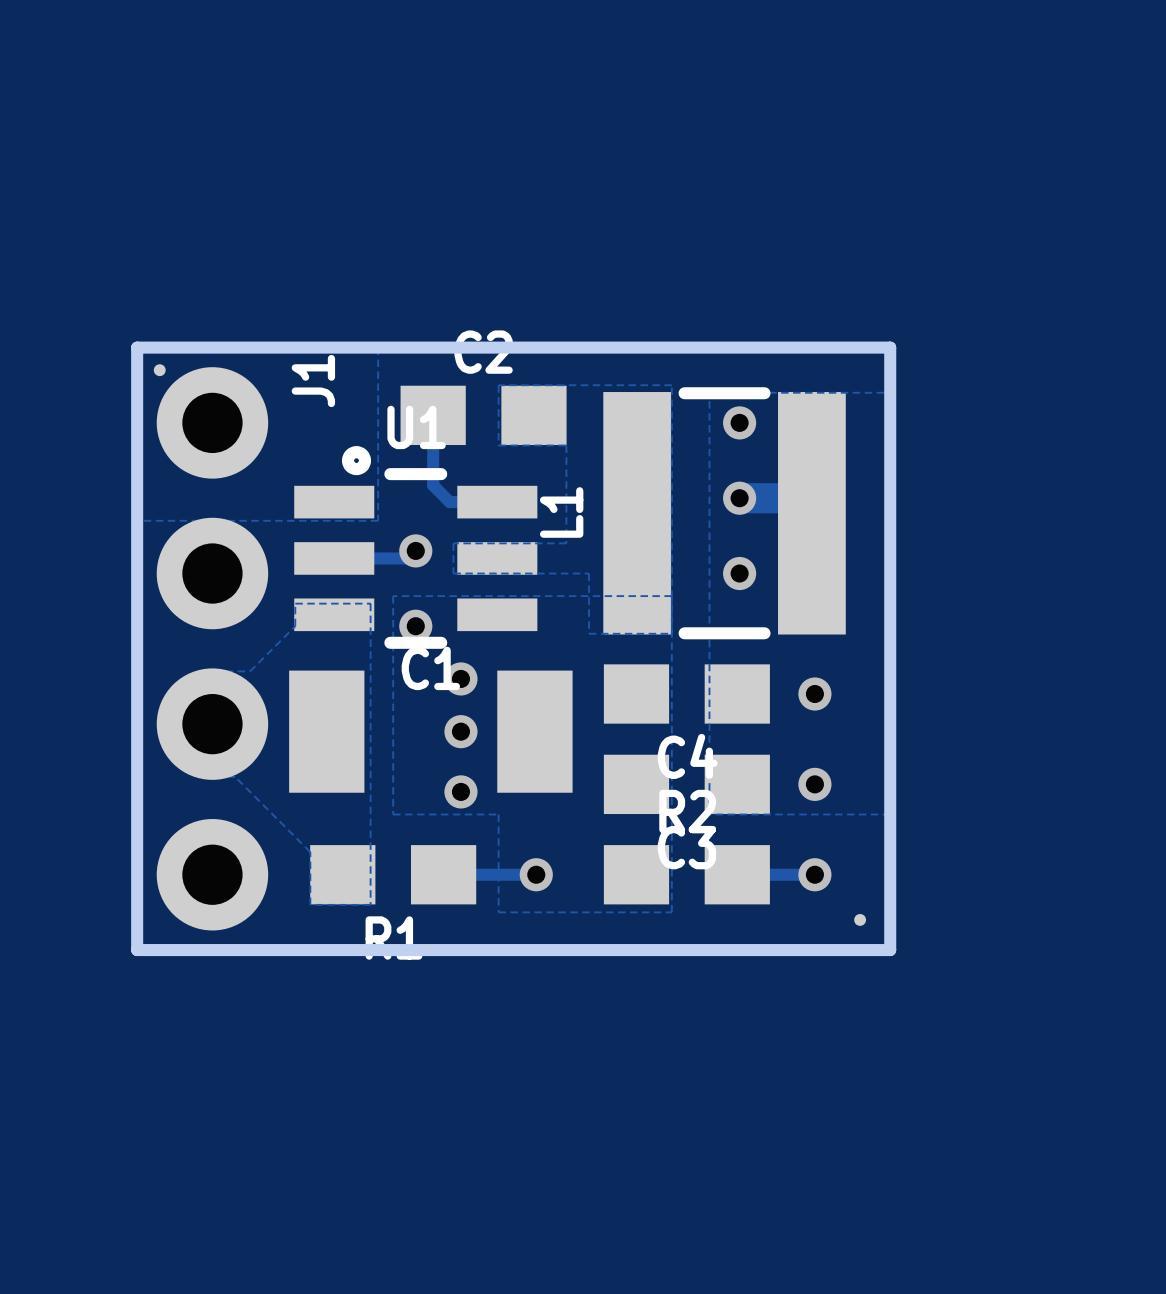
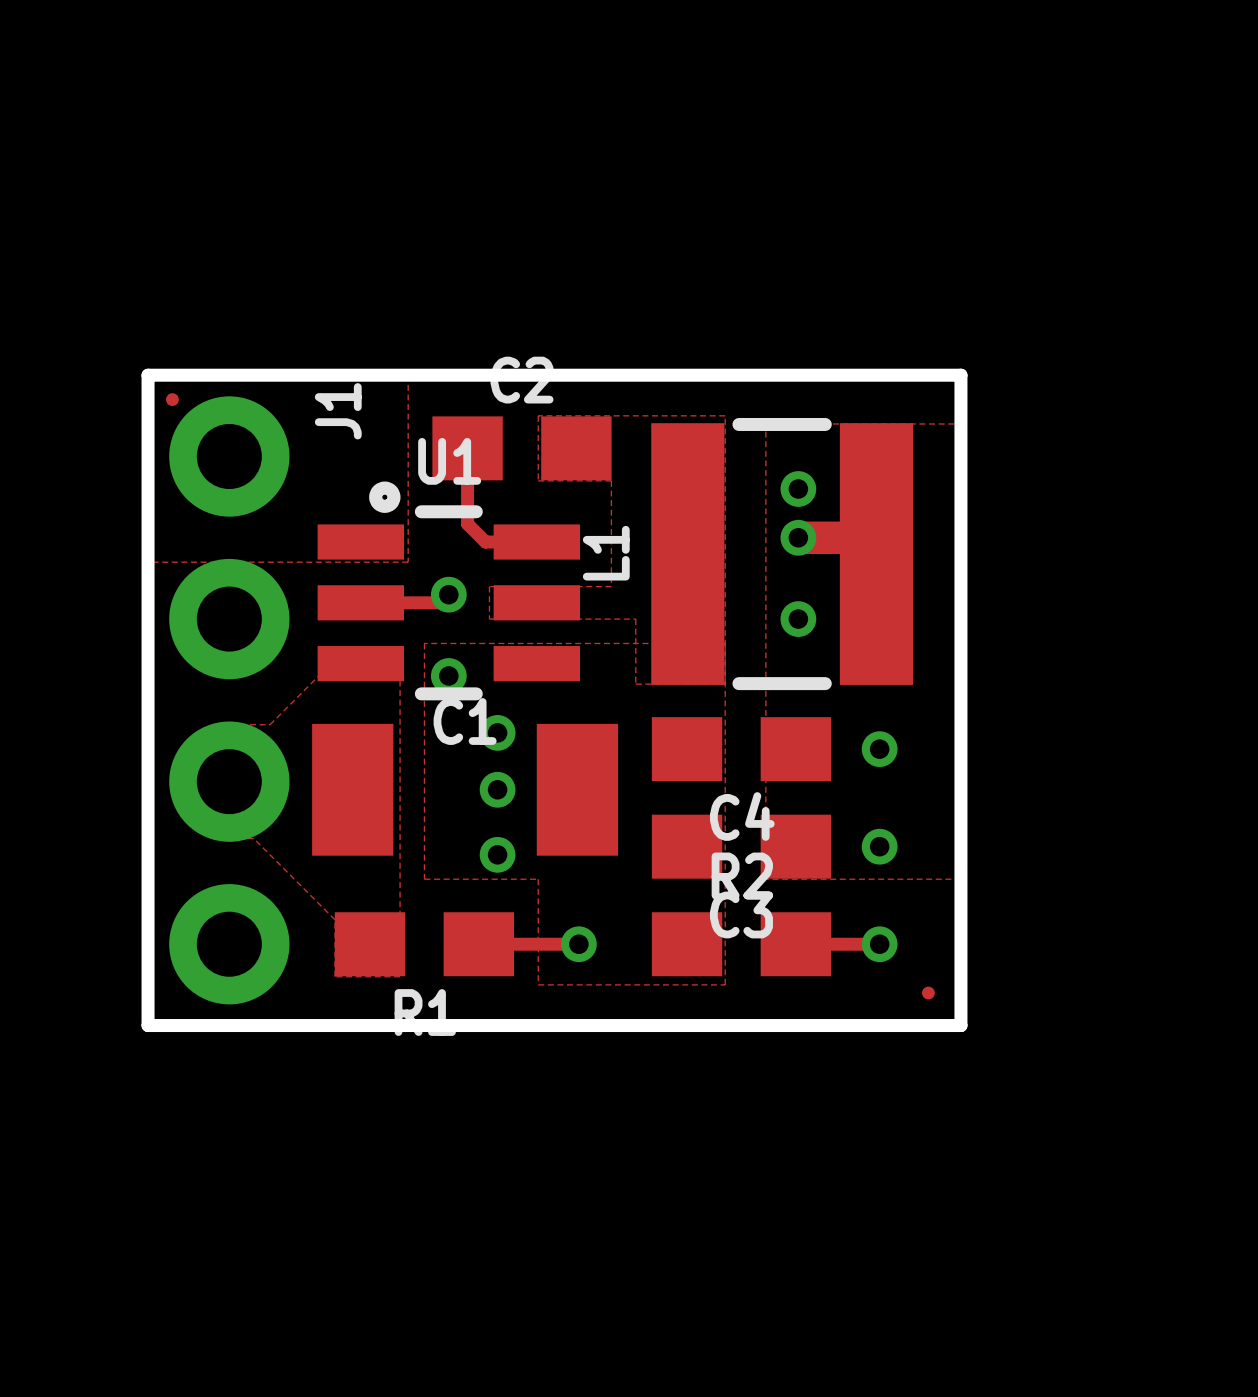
via position: (739, 422) -> (798, 489)

